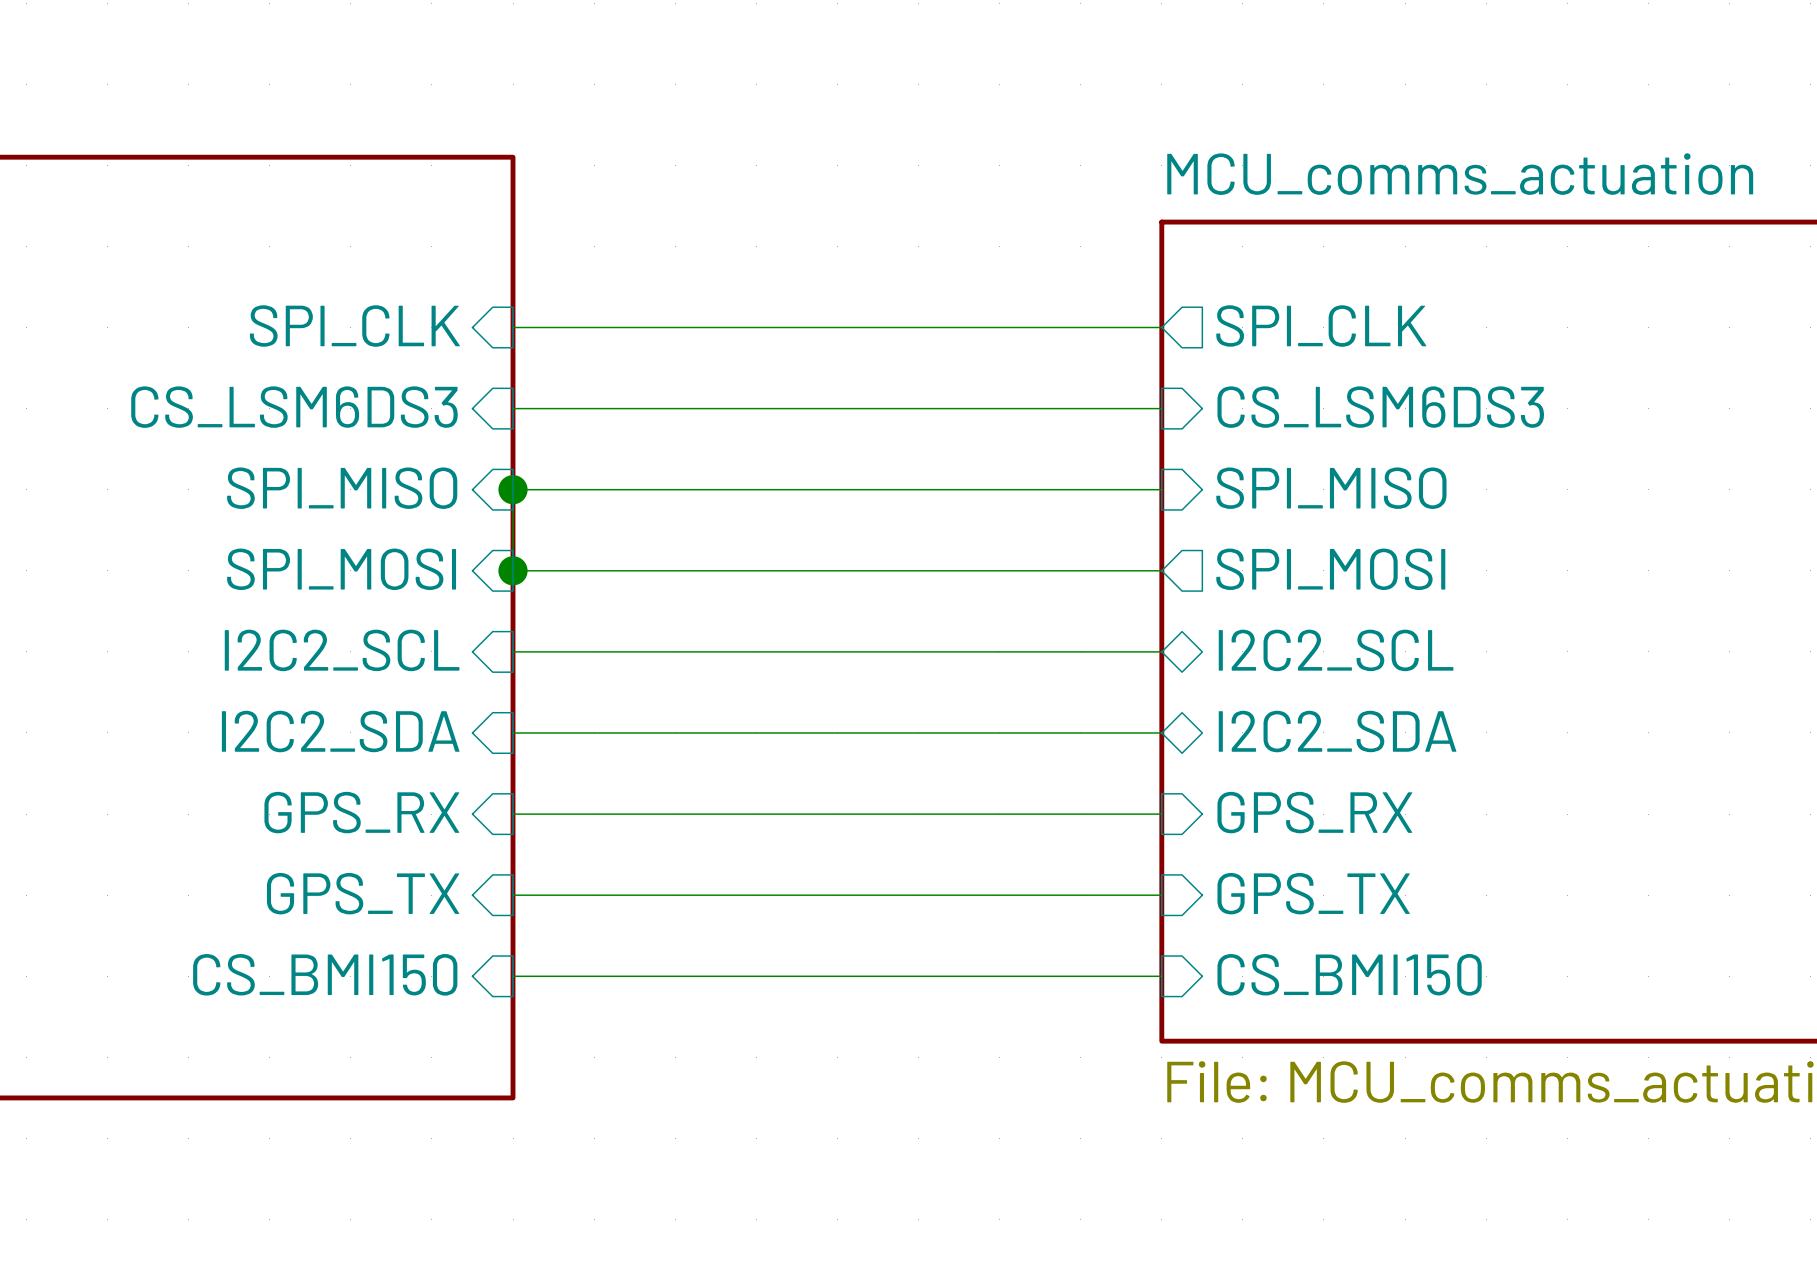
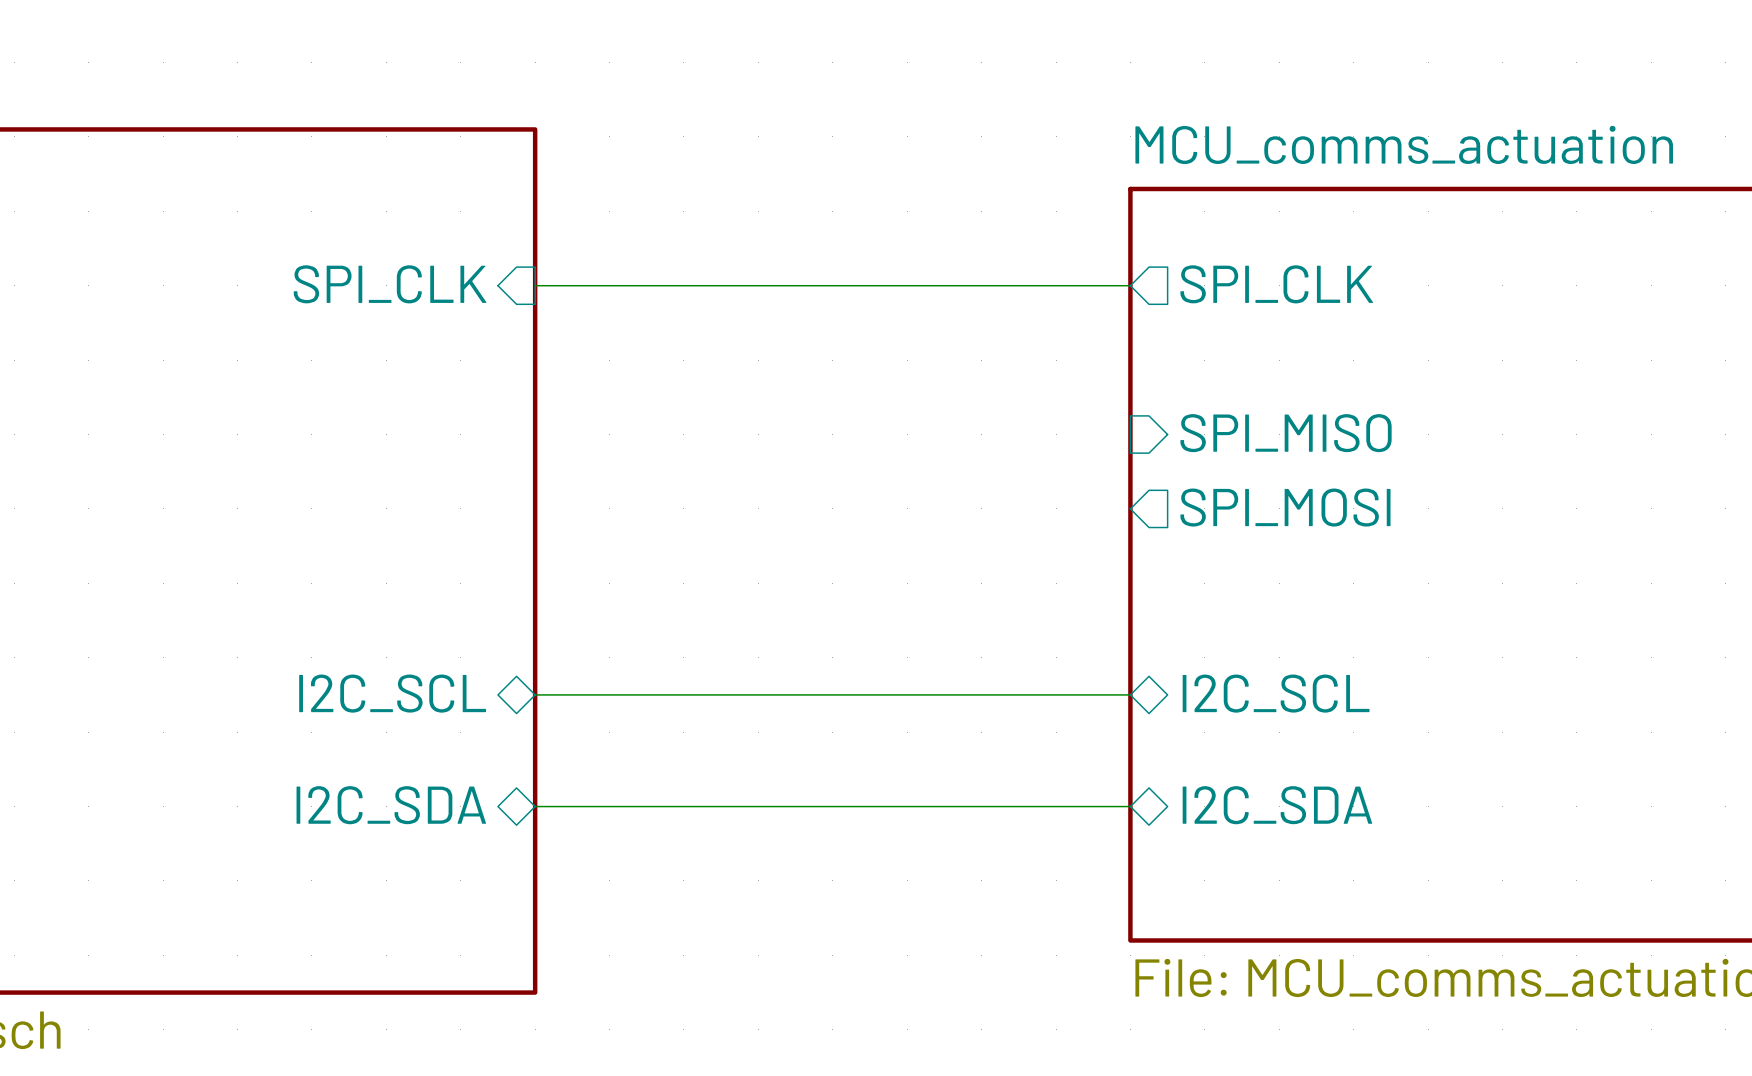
sheet pin: CS_LSM6DS3 (294, 407) -> none
sheet pin: CS_LSM6DS3 (1380, 407) -> none
wire: (513, 408) (1161, 408) -> none
sheet pin: SPI_MISO (342, 488) -> none
junction: (513, 489) -> none
wire: (1161, 489) (513, 489) (513, 570) (1161, 570) -> none
sheet pin: SPI_MOSI (341, 569) -> none
junction: (513, 570) -> none
sheet pin: I2C2_SCL (342, 650) -> none
sheet pin: I2C2_SCL (1336, 650) -> none
wire: (513, 651) (1161, 651) -> none
sheet pin shape: input (340, 731) -> bidirectional (392, 693)
sheet pin: I2C2_SDA (340, 731) -> I2C_SCL (392, 693)
sheet pin: I2C2_SDA (1337, 731) -> I2C_SCL (1276, 693)
wire: (513, 732) (1161, 732) -> (535, 694) (1130, 694)
sheet pin: GPS_RX (361, 812) -> none
sheet pin: GPS_RX (1314, 812) -> none
wire: (513, 814) (1161, 814) -> none
sheet pin shape: input (363, 893) -> bidirectional (391, 805)
sheet pin: GPS_TX (363, 893) -> I2C_SDA (391, 805)
sheet pin shape: input (1313, 893) -> bidirectional (1277, 805)
sheet pin: GPS_TX (1313, 893) -> I2C_SDA (1277, 805)
sheet pin: CS_BMI150 (325, 974) -> none
sheet pin: CS_BMI150 (1349, 974) -> none
wire: (513, 976) (1161, 976) -> none

